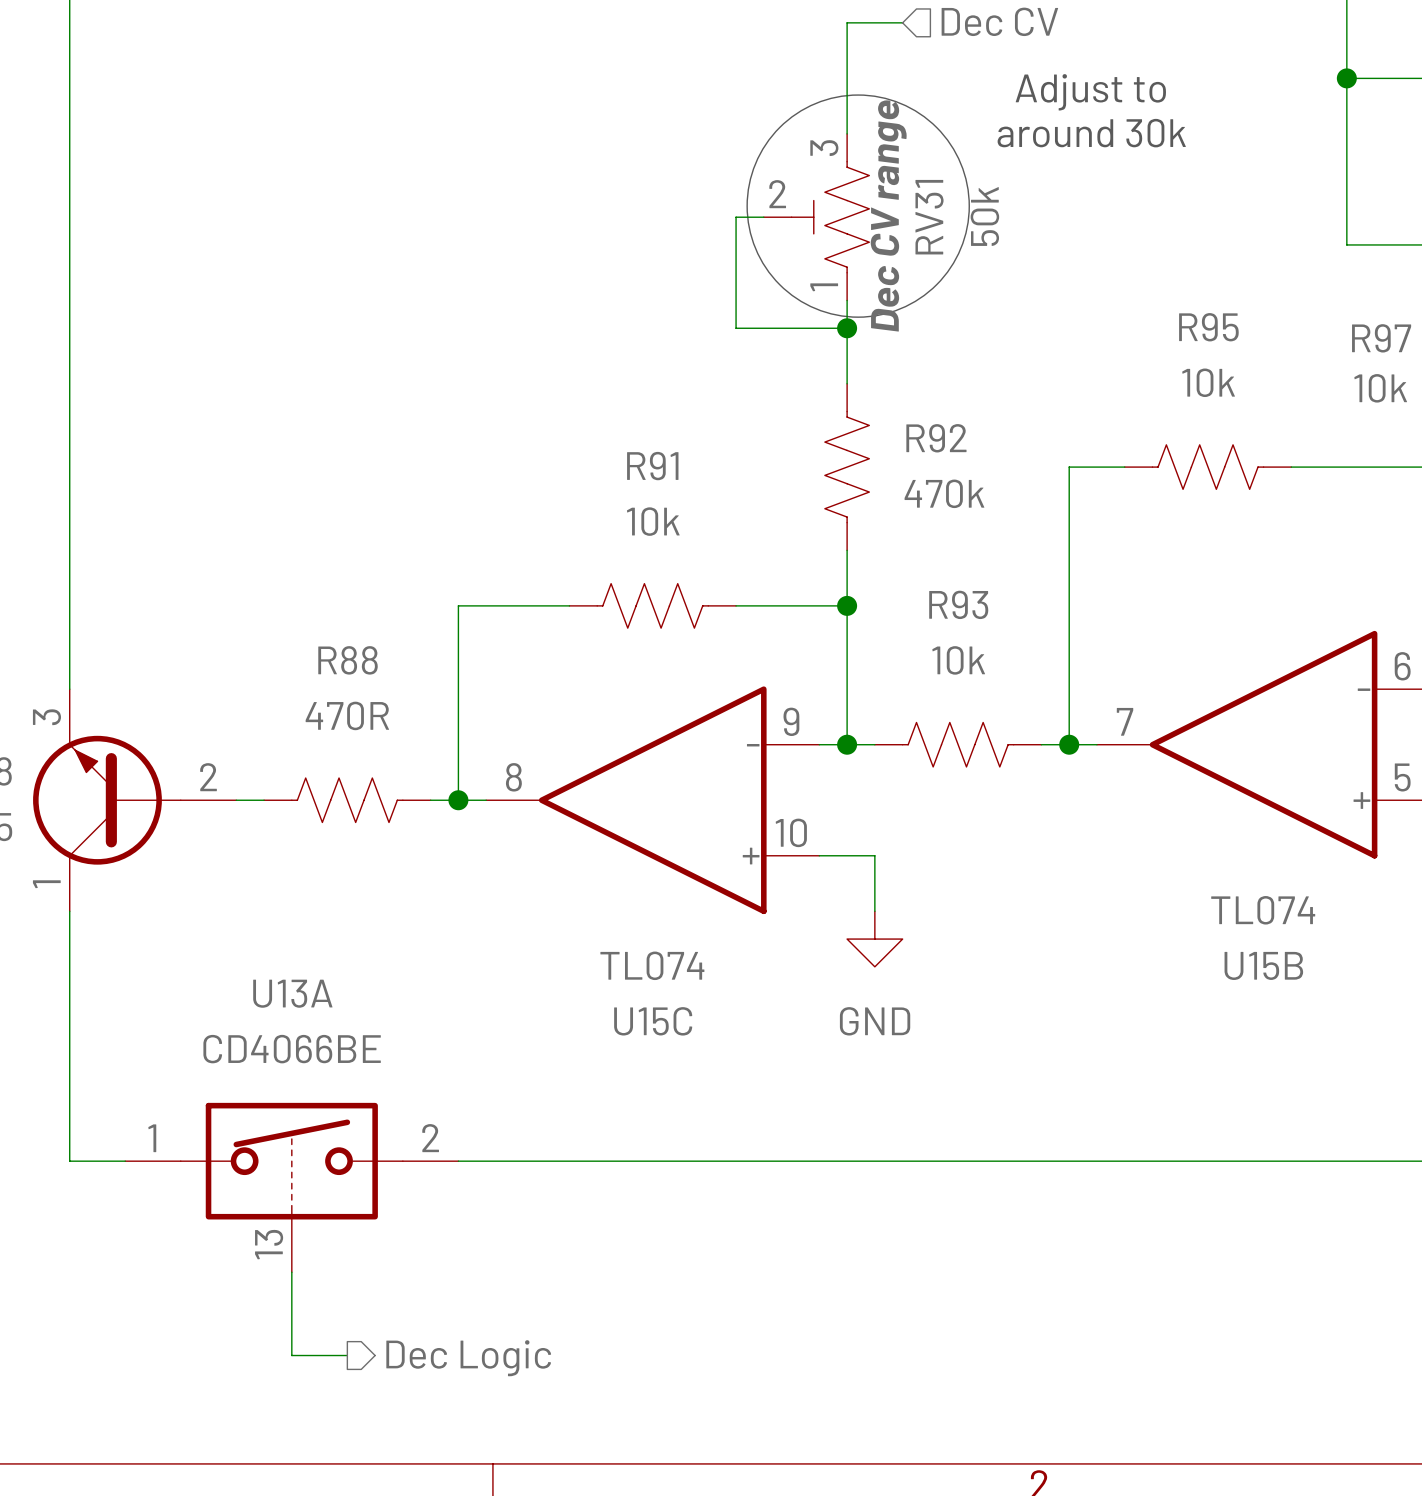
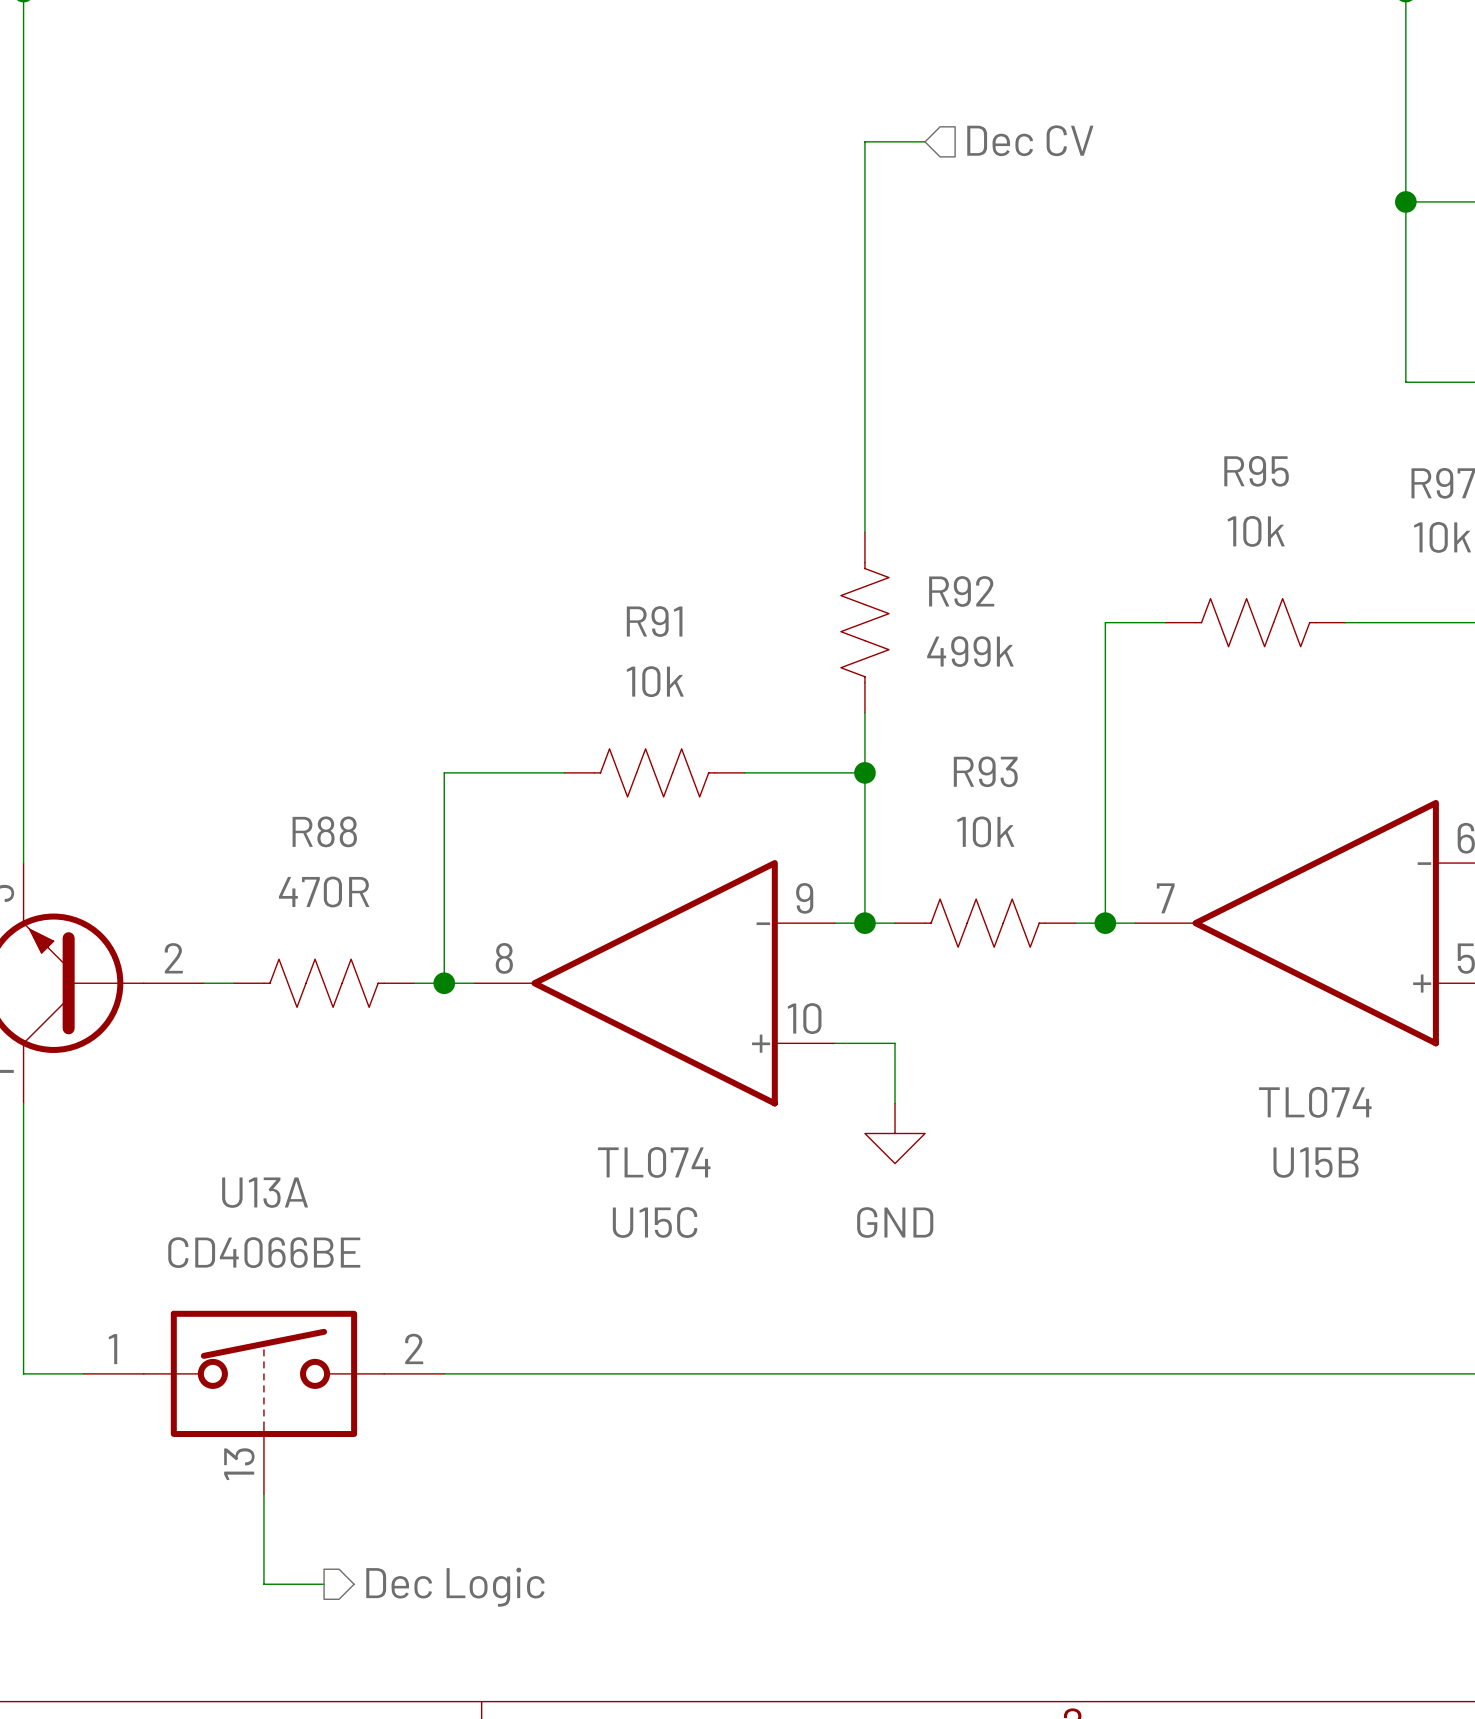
text: Adjust to (1090, 92) -> none
drawing: [747, 95, 970, 318] -> none
wire: none -> (864, 262) (864, 442)
text: around 30k (1091, 133) -> none
wire: (763, 217) (736, 217) (736, 328) (847, 328) -> none
RV31: 50k (816, 217) -> none
junction: (847, 328) -> none
R92 value: 470k (944, 493) -> 499k (970, 651)

